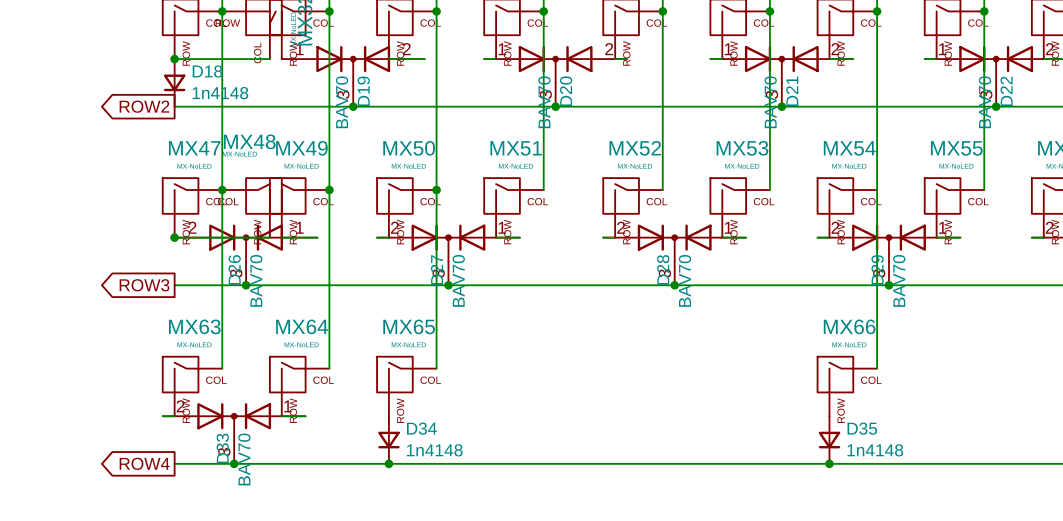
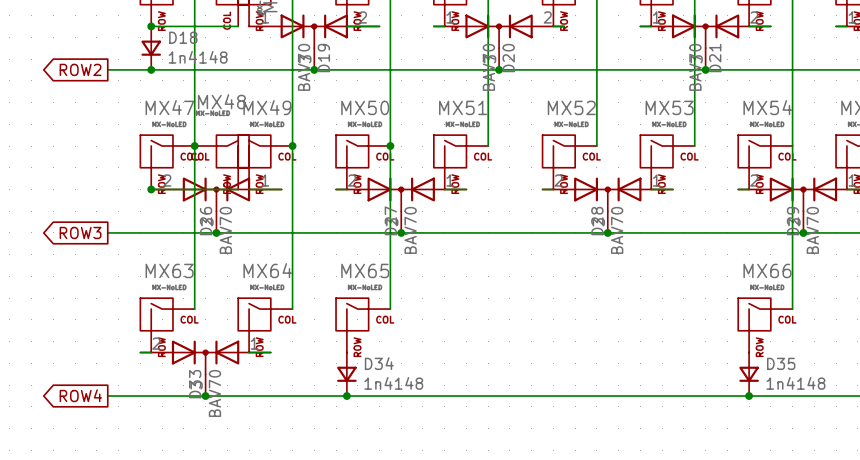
wire: none -> (107, 69) (151, 69)
global label position: ROW2 (144, 106) -> ROW2 (80, 69)
junction: none -> (151, 69)
wire: none -> (107, 232) (151, 232)
global label position: ROW3 (144, 285) -> ROW3 (80, 232)
wire: none -> (107, 396) (151, 396)
global label position: ROW4 (144, 463) -> ROW4 (80, 395)

